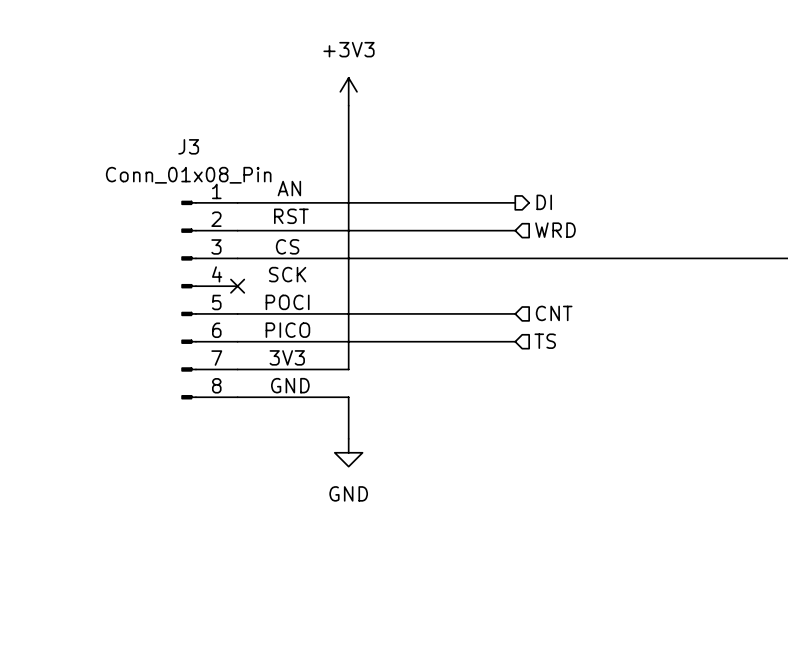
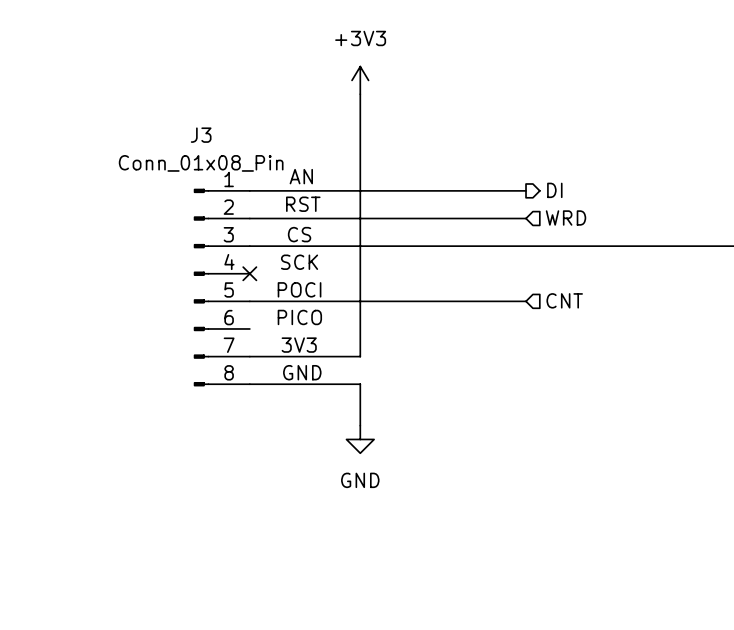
wire: (237, 341) (515, 341) -> none
hierarchical label: TS (545, 341) -> none

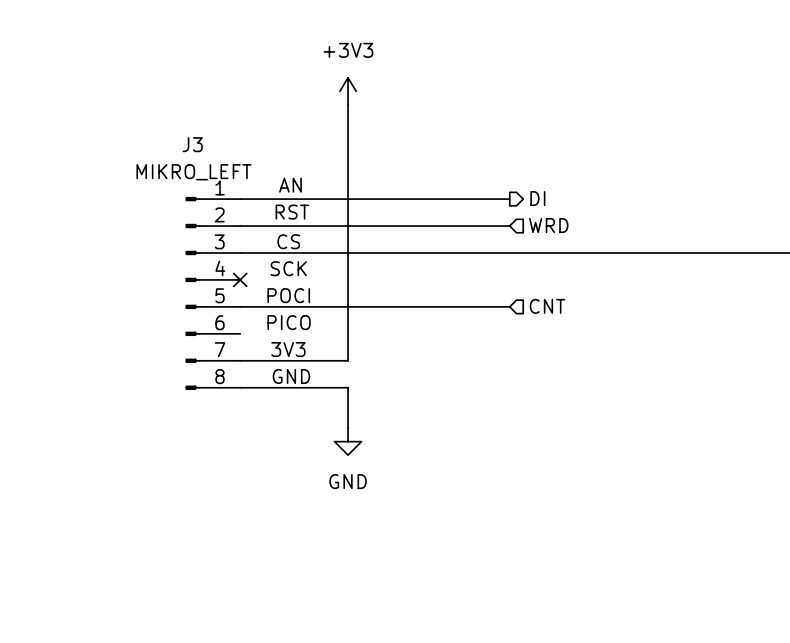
J3 value: Conn_01x08_Pin (201, 163) -> MIKRO_LEFT (194, 172)

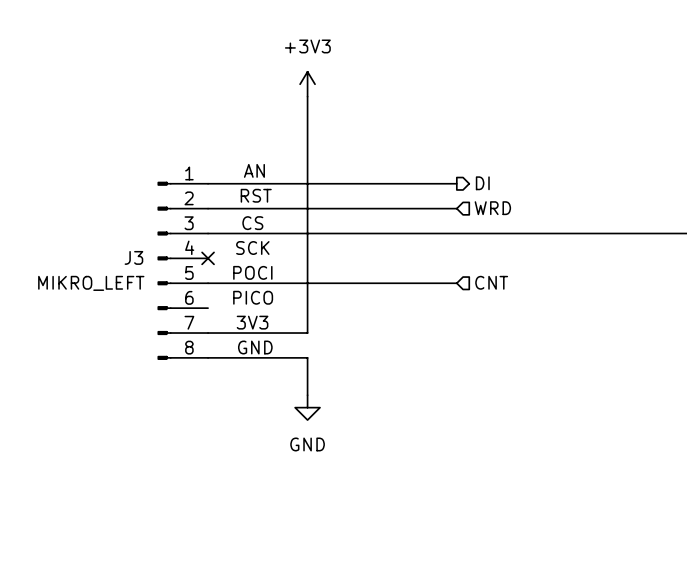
J3 name position: J3 (192, 144) -> J3 (133, 257)
J3 value position: MIKRO_LEFT (194, 172) -> MIKRO_LEFT (91, 283)

